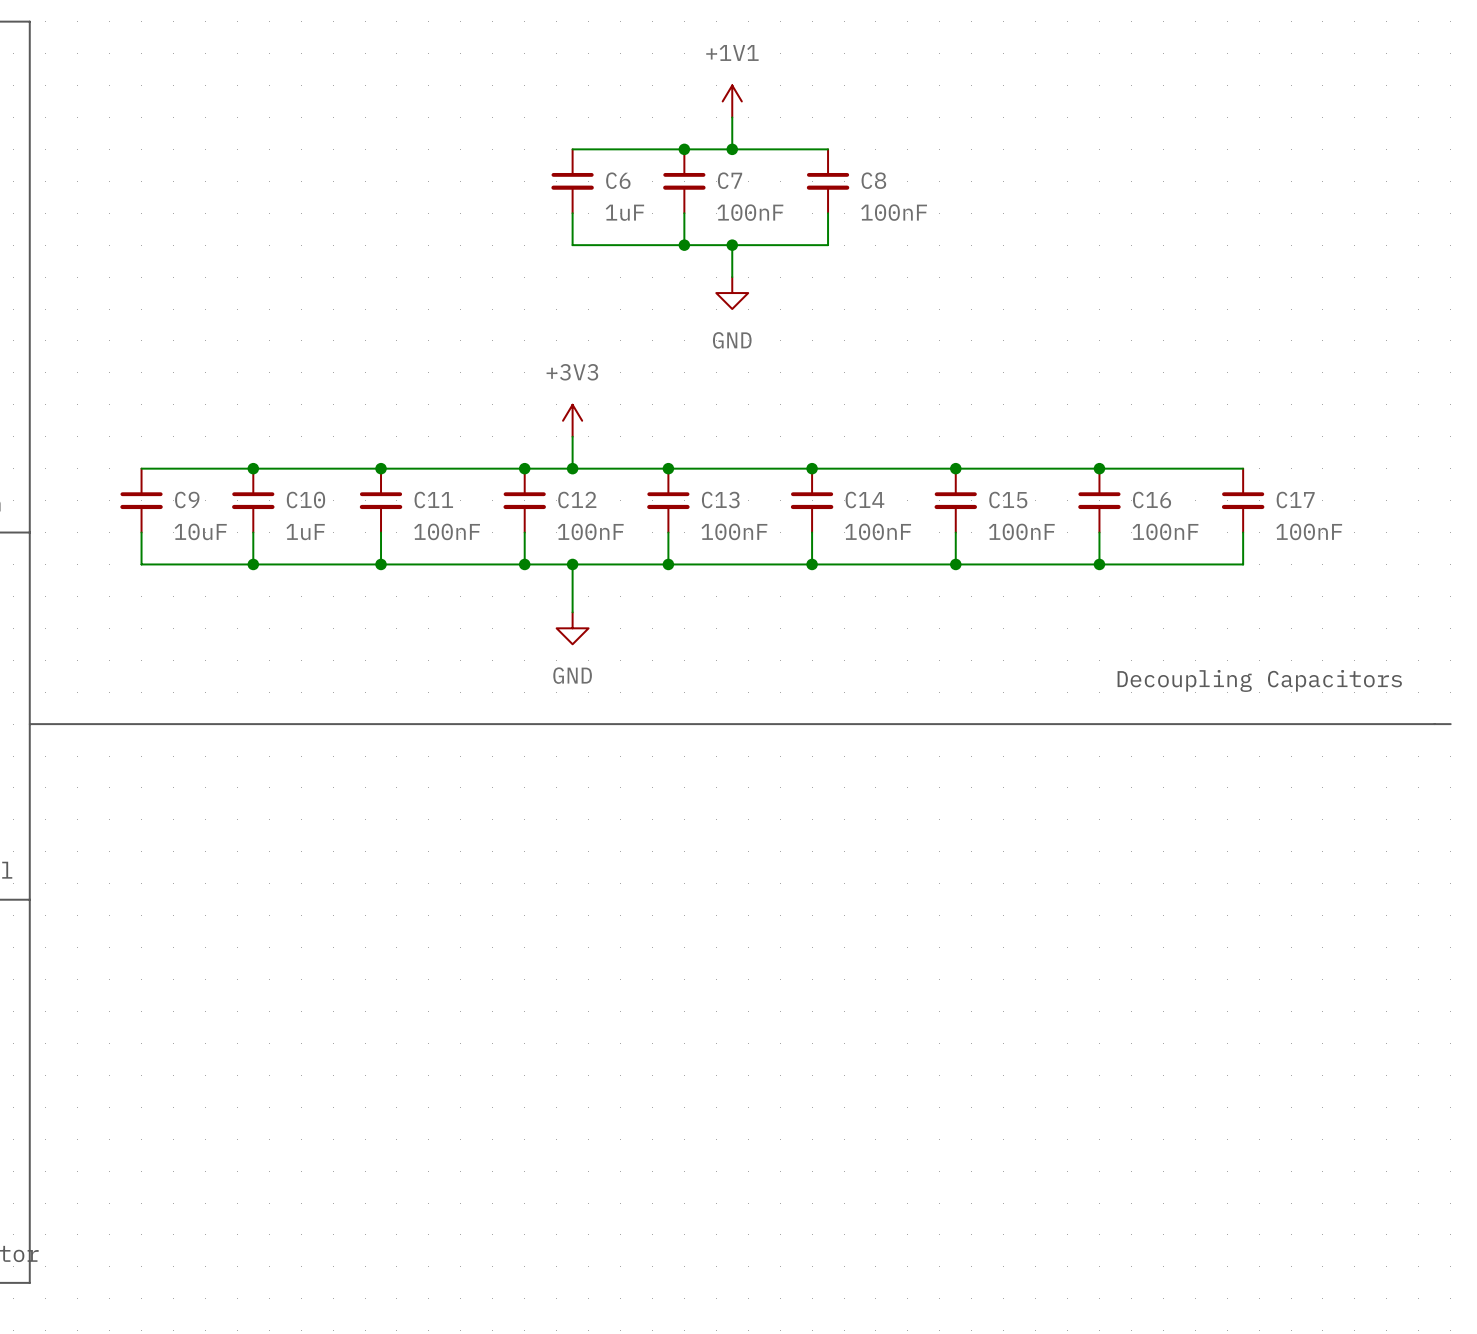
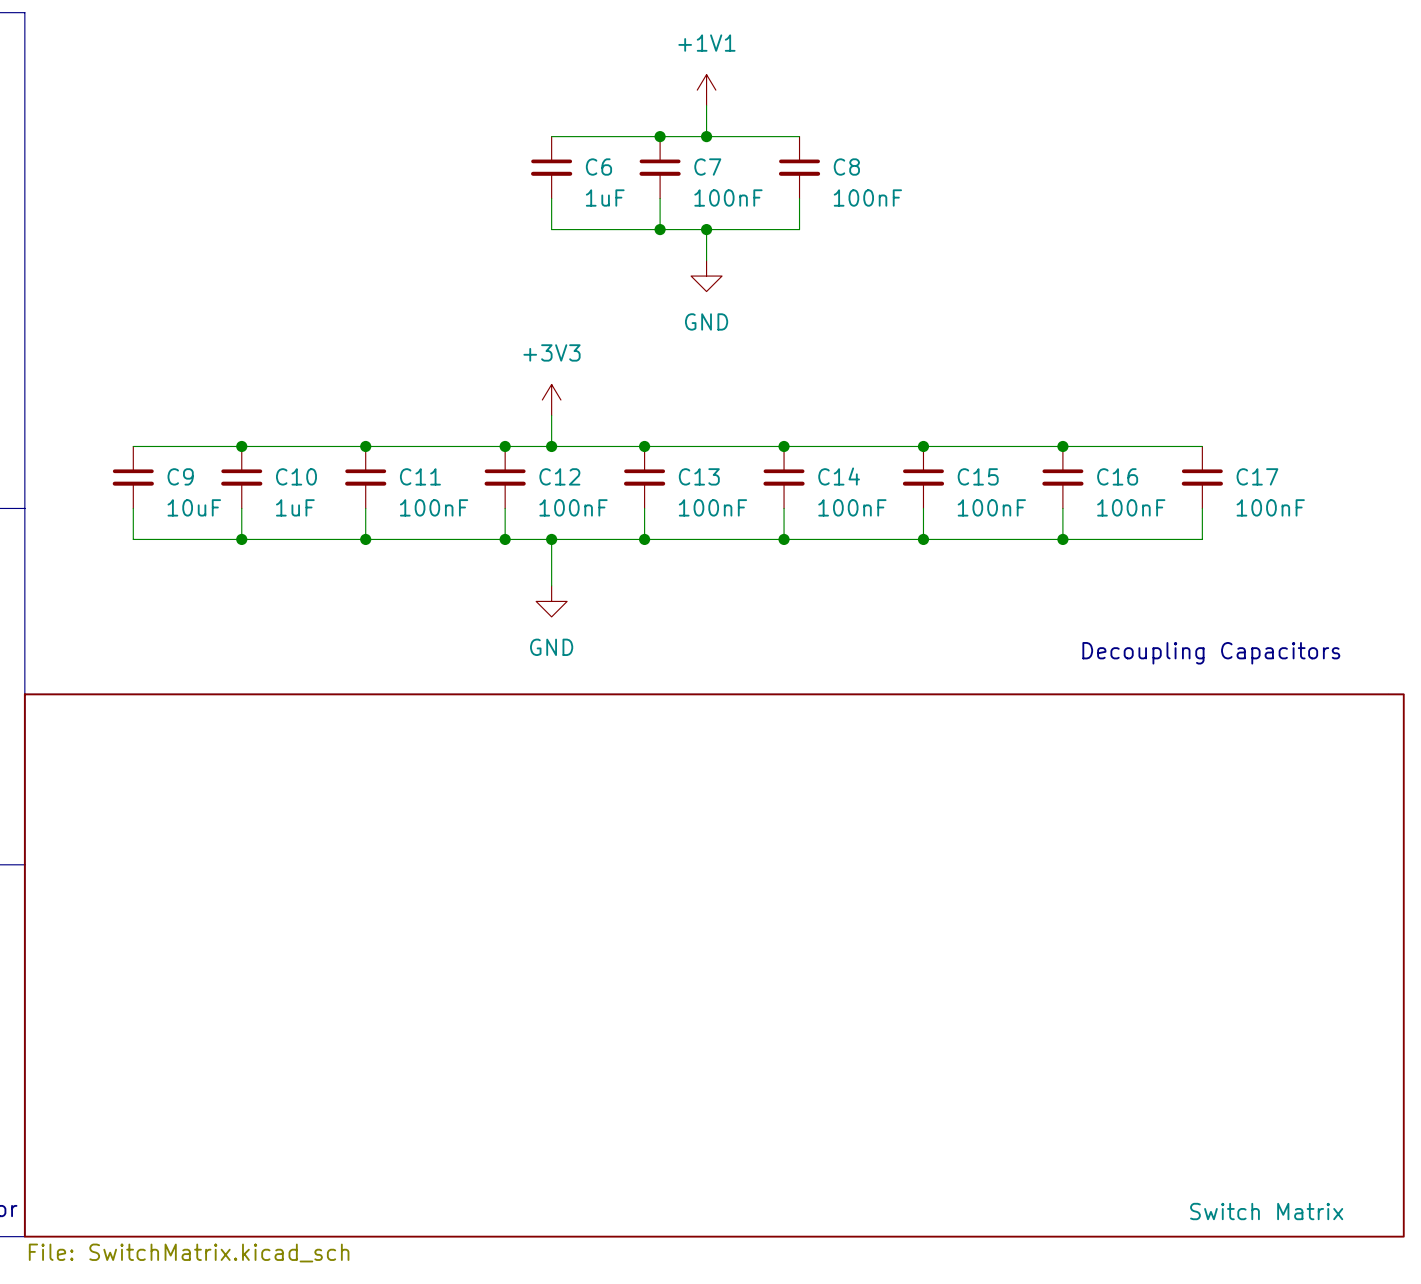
sheet Switch Matrix: none -> File: SwitchMatrix.kicad_sch (714, 965)

